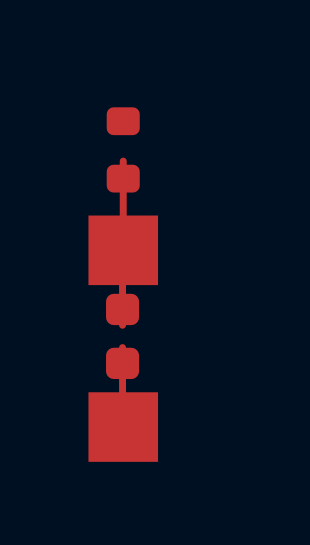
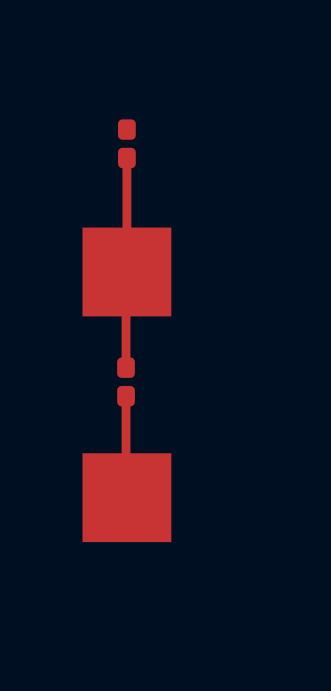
part footprint: [106, 107, 140, 193] -> [118, 119, 136, 169]
part footprint: [106, 293, 140, 380] -> [117, 357, 135, 407]

